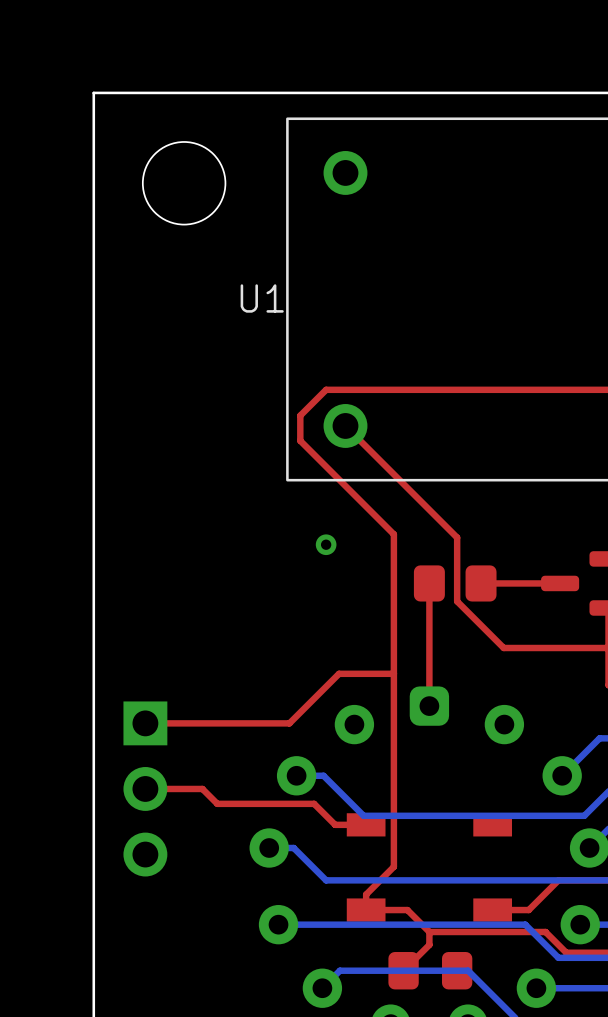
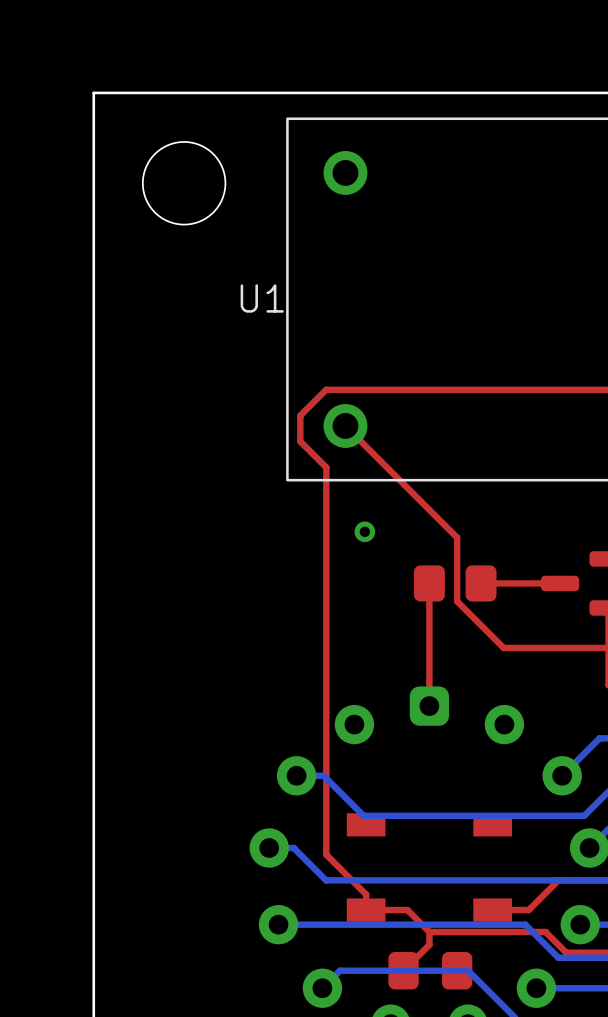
top track: (300, 440) (393, 534) (393, 866) (366, 894) -> (300, 440) (326, 467) (326, 854) (366, 894)
via position: (326, 544) -> (364, 531)
top track: (393, 673) (339, 673) (289, 723) (145, 723) -> none
top track: (145, 788) (202, 788) (217, 803) (314, 803) (335, 824) (366, 824) -> none
part: (145, 788) -> none

